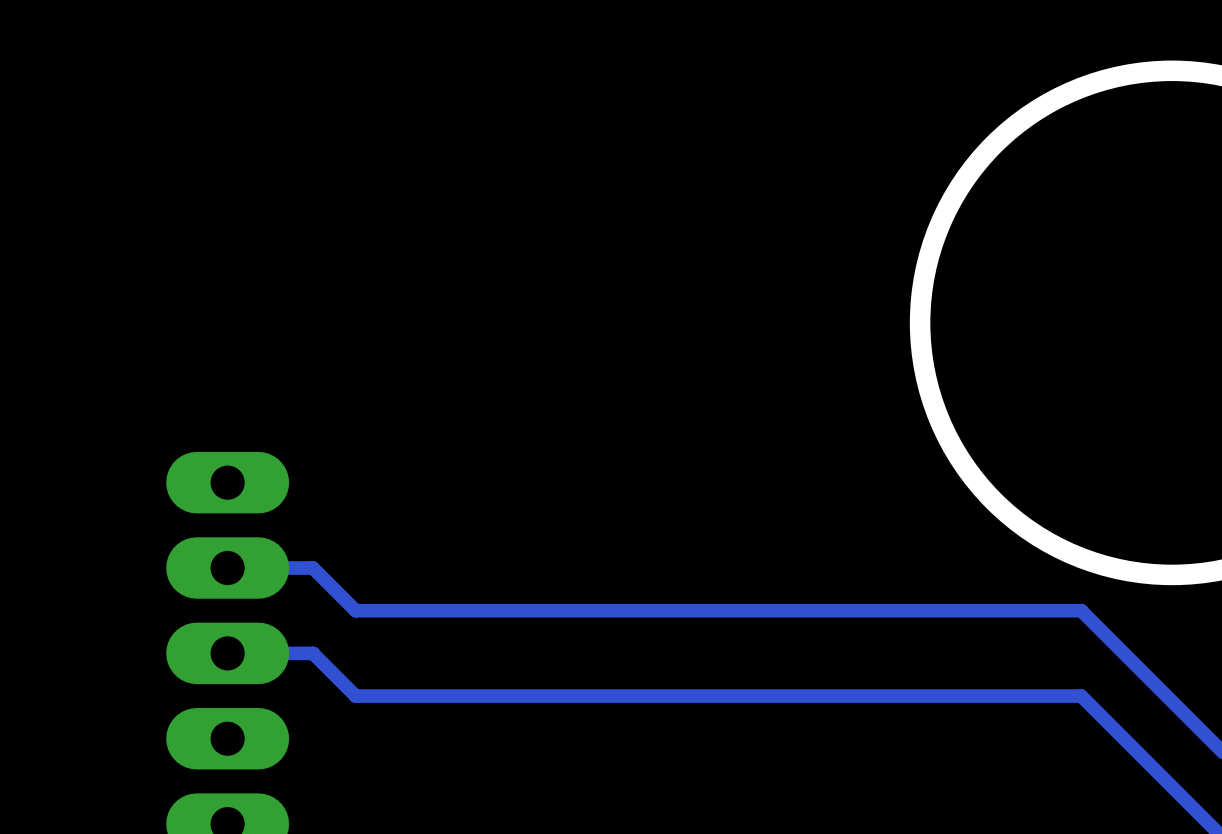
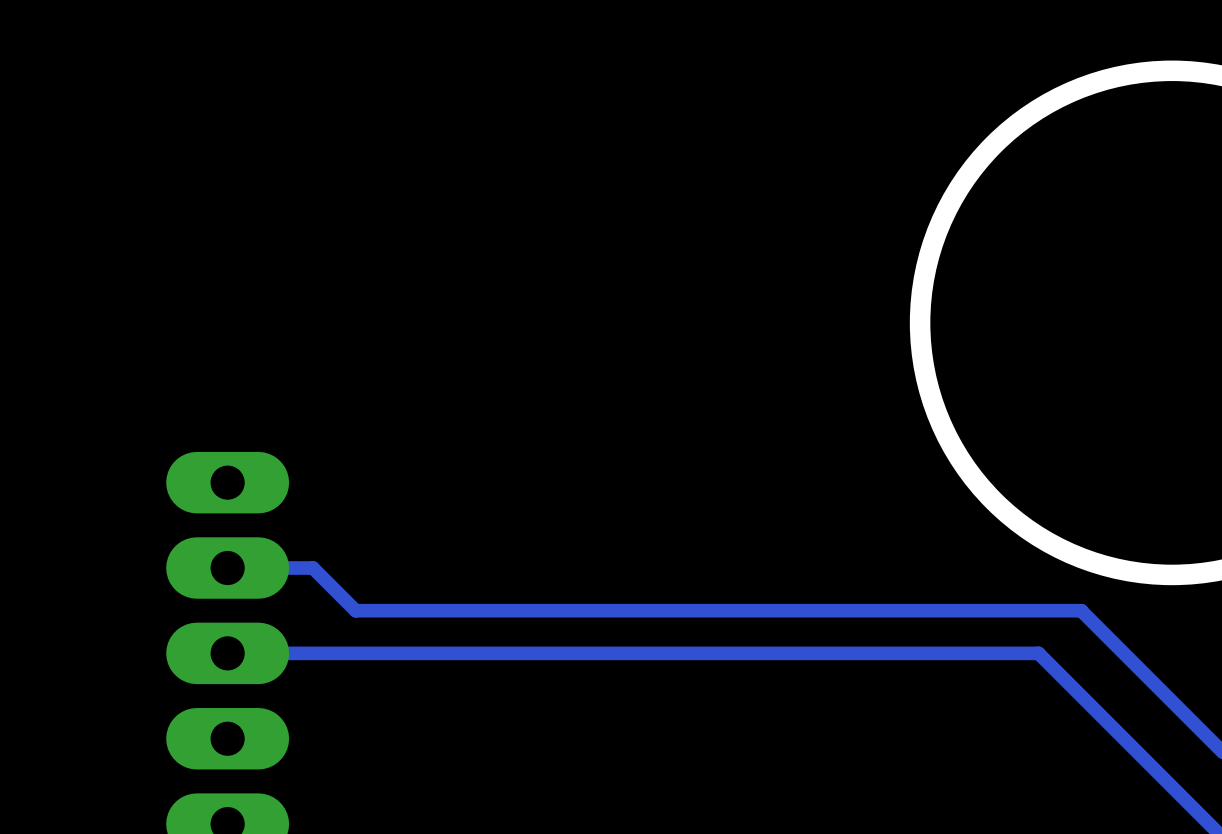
track: (313, 653) (355, 696) (1081, 696) -> (313, 653) (1038, 653) (1081, 696)

